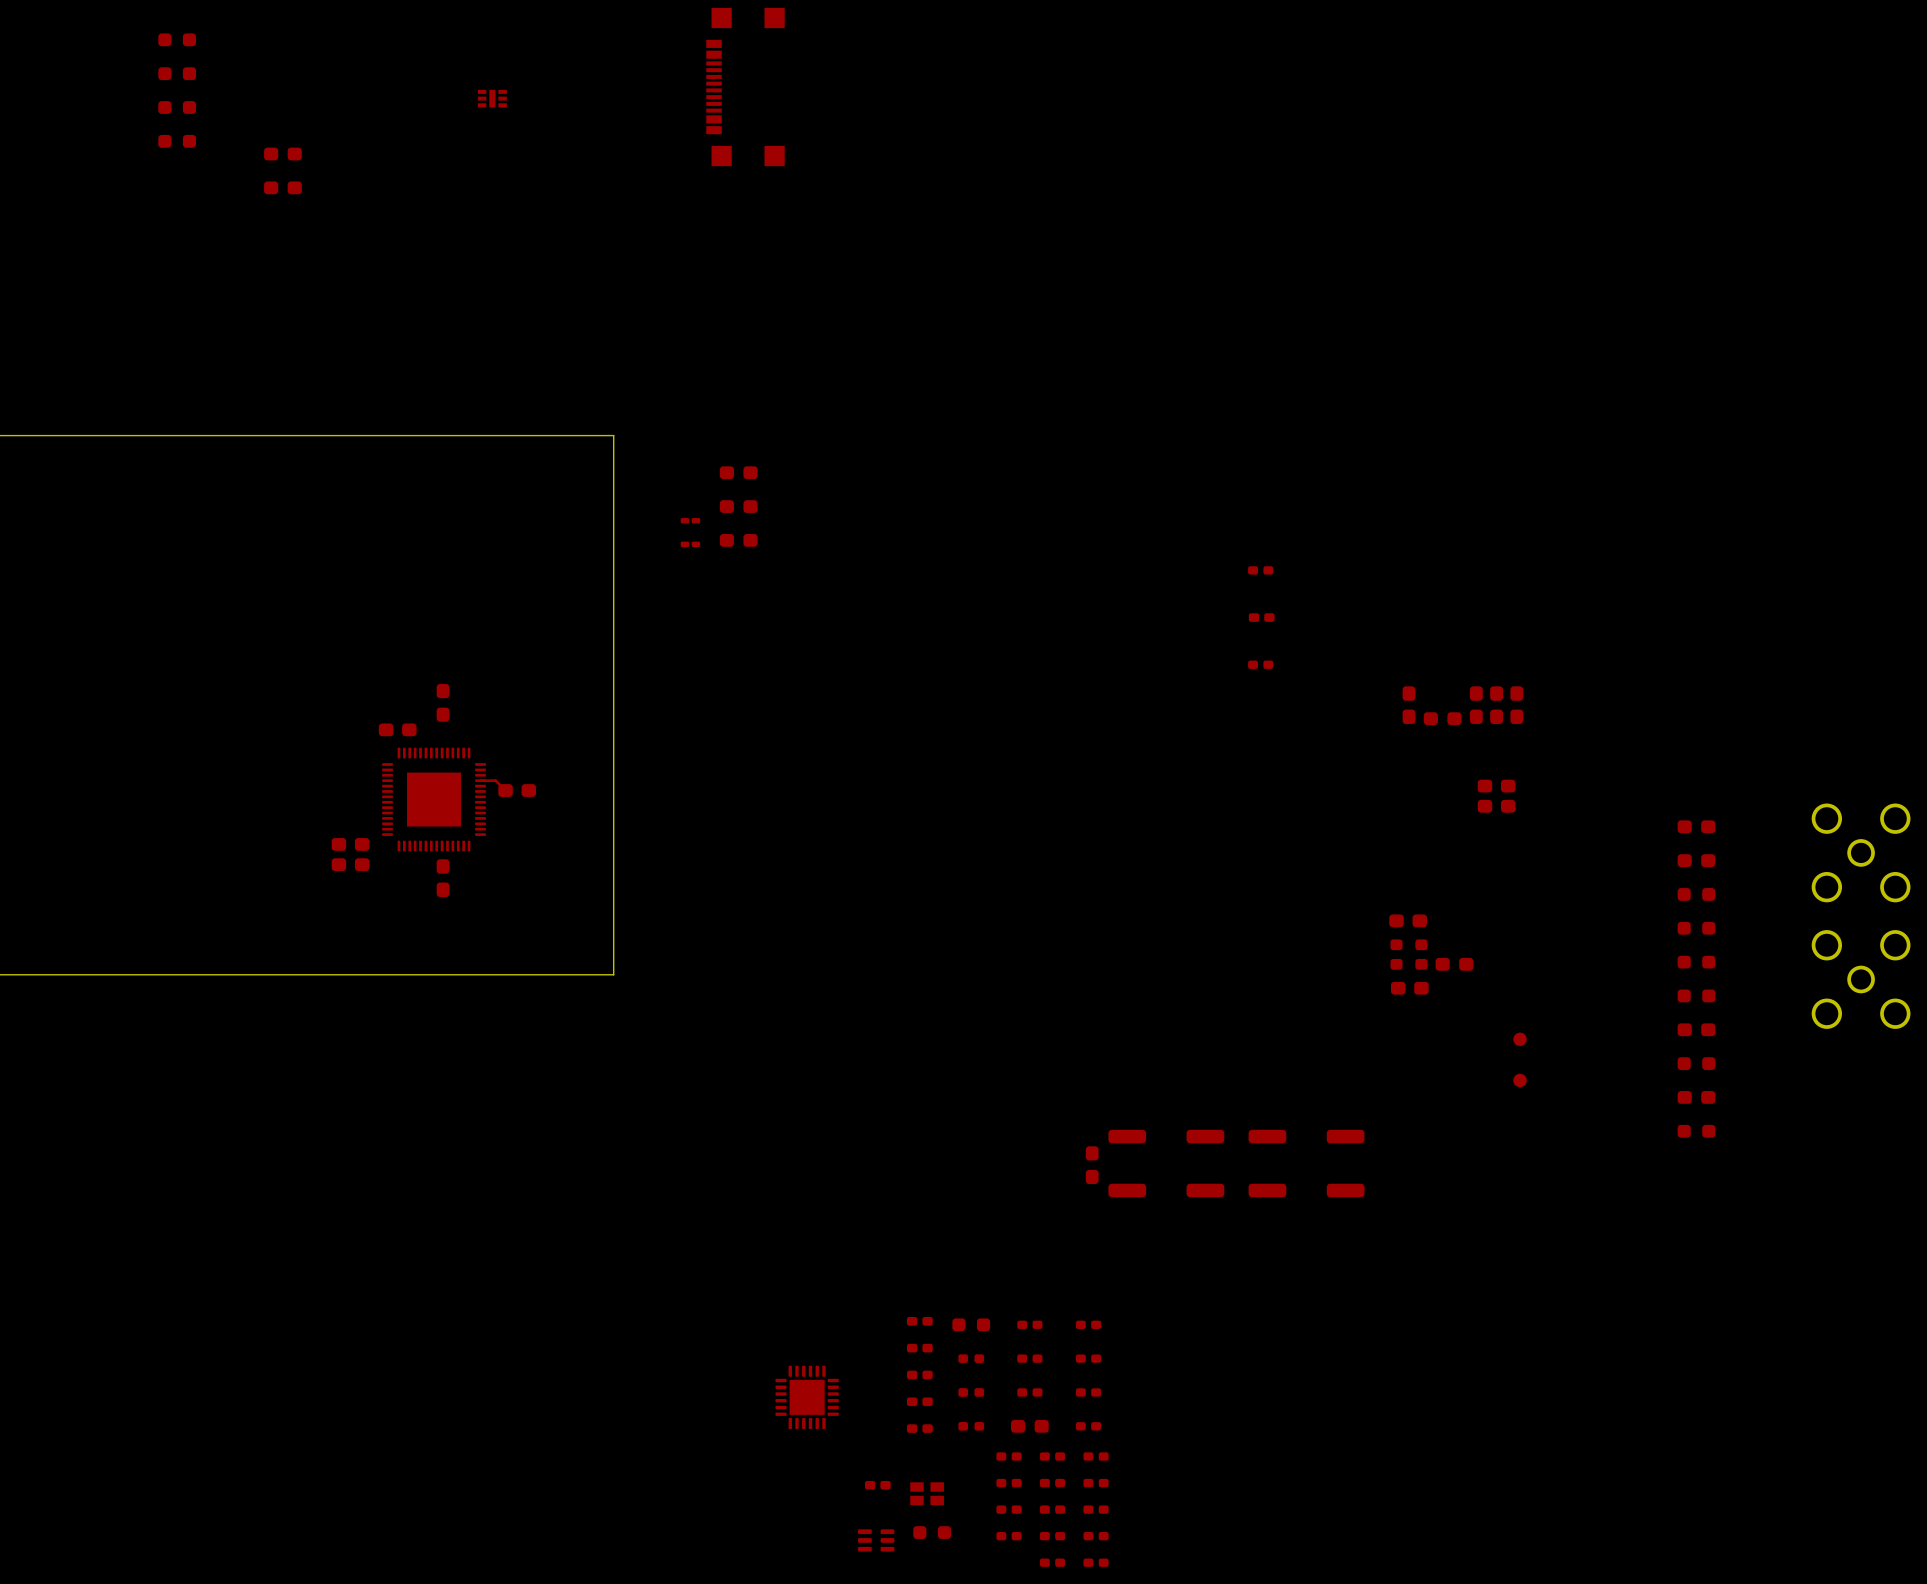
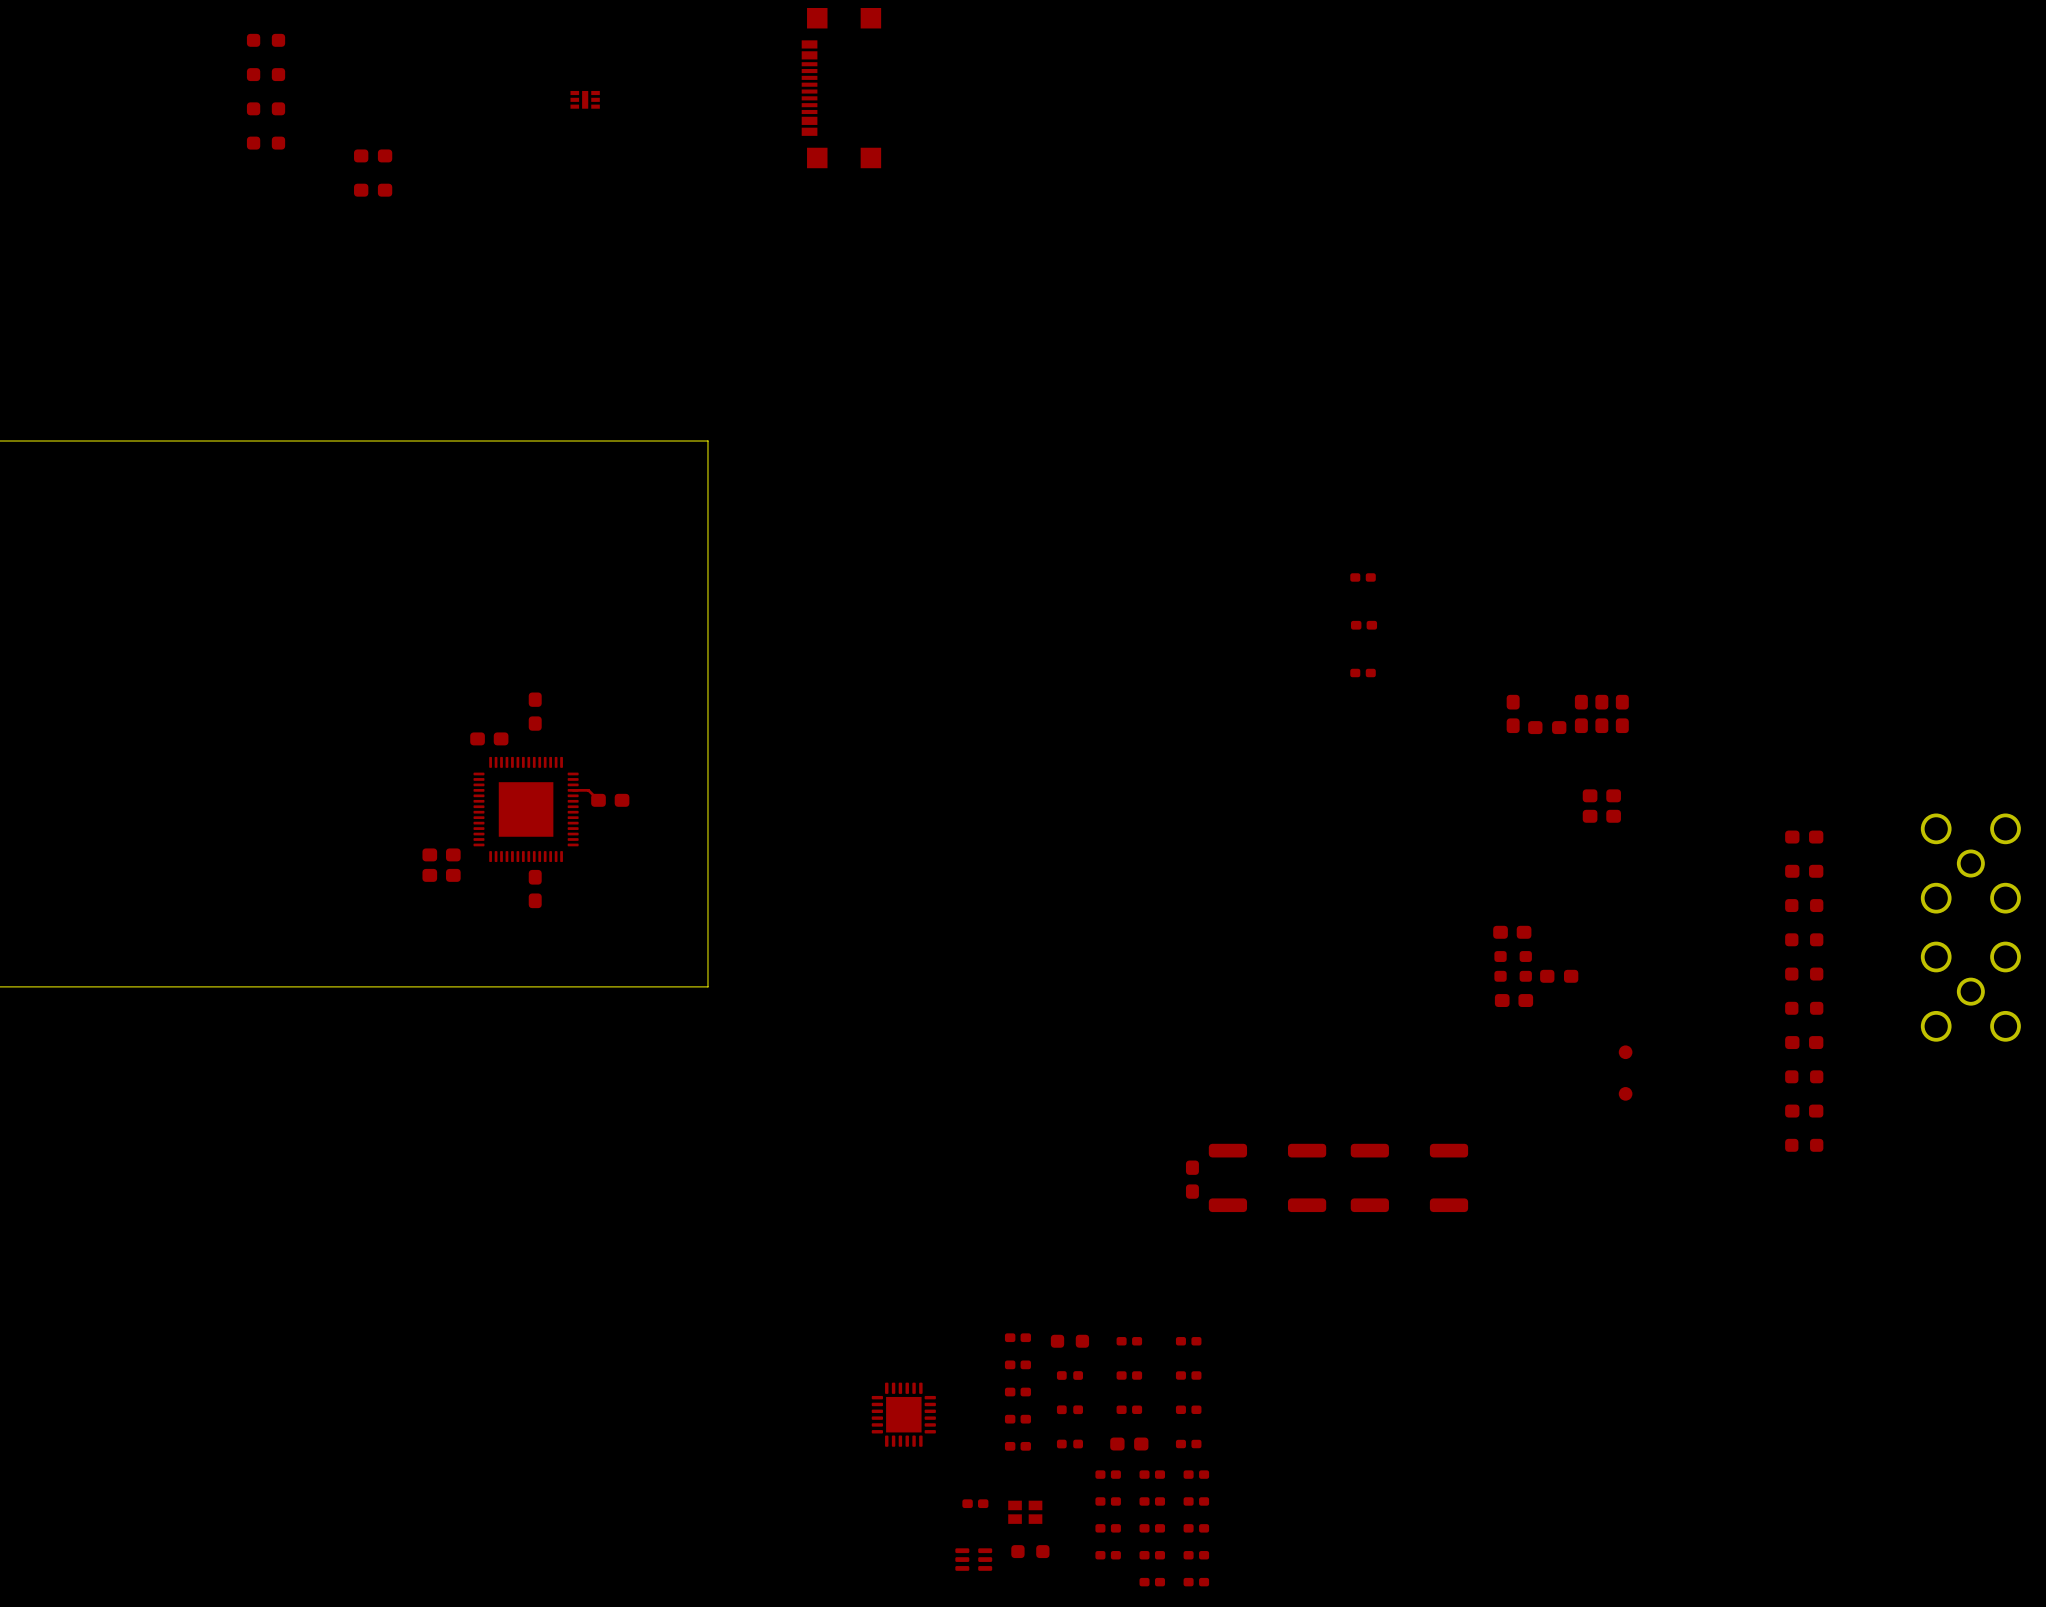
part: (738, 472) -> none
part: (738, 506) -> none
part: (690, 520) -> none
part: (738, 540) -> none
part: (690, 544) -> none

